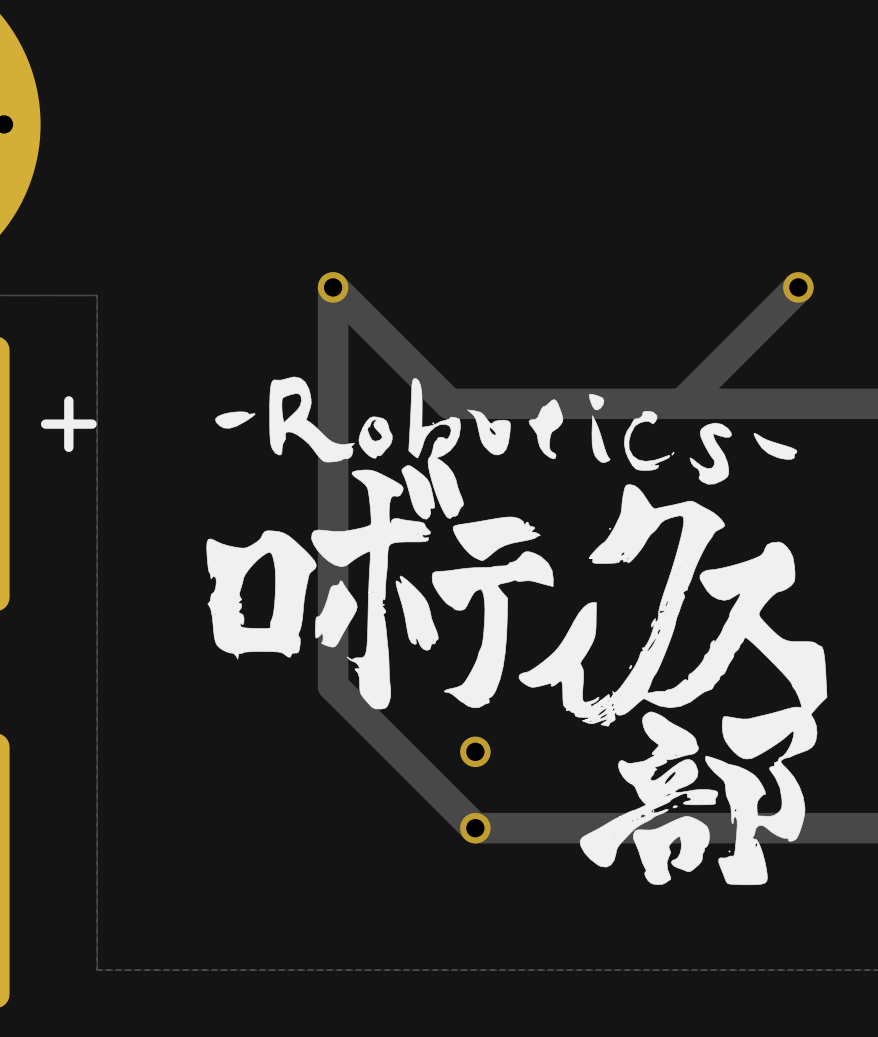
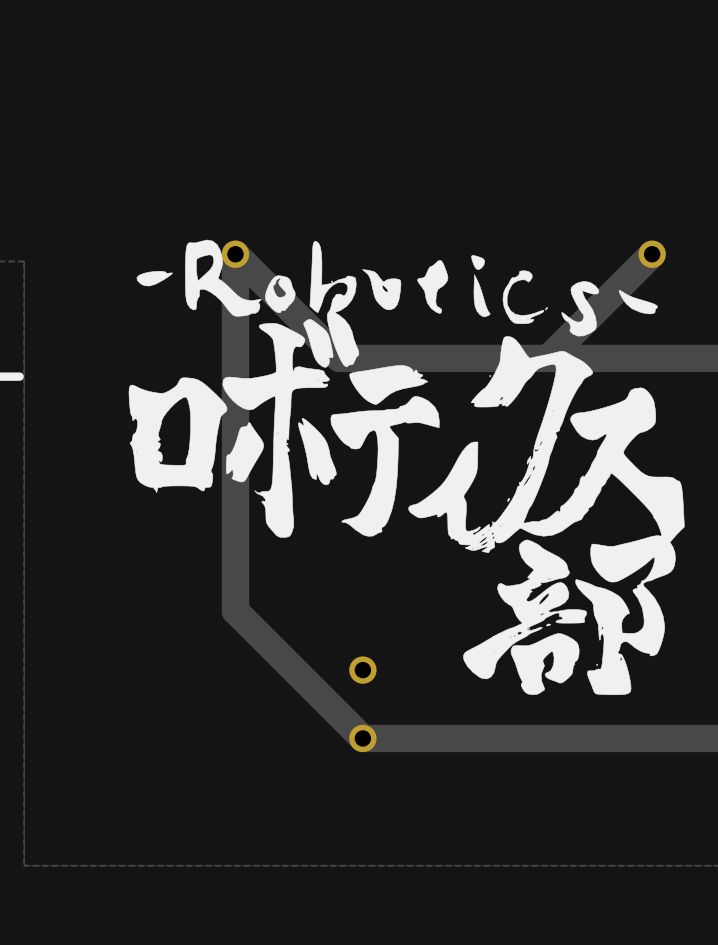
drawing position: (516, 630) -> (406, 467)

